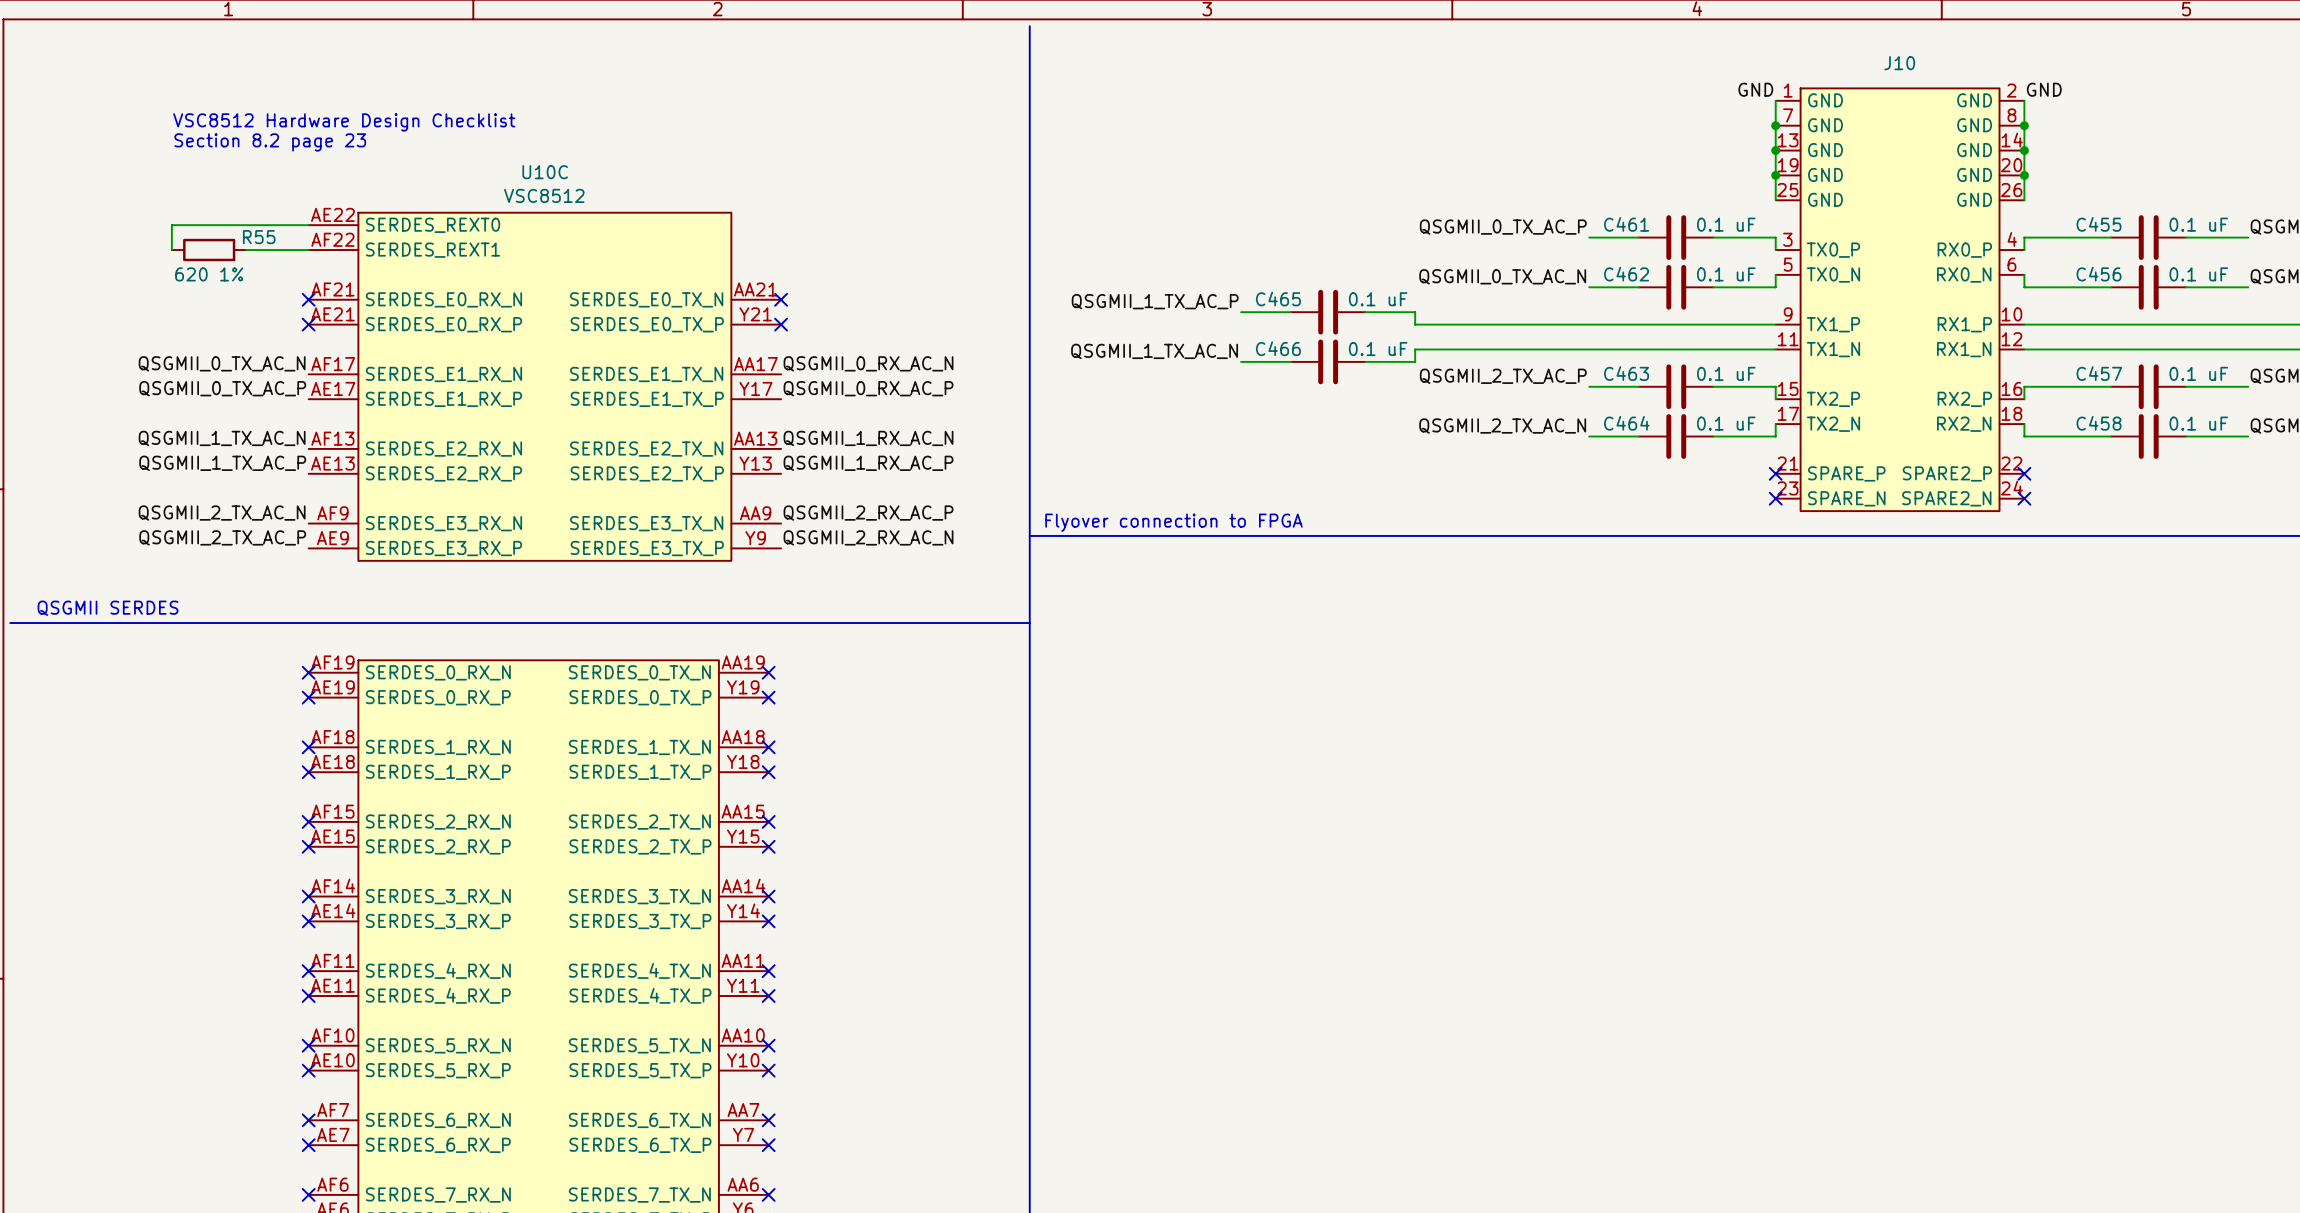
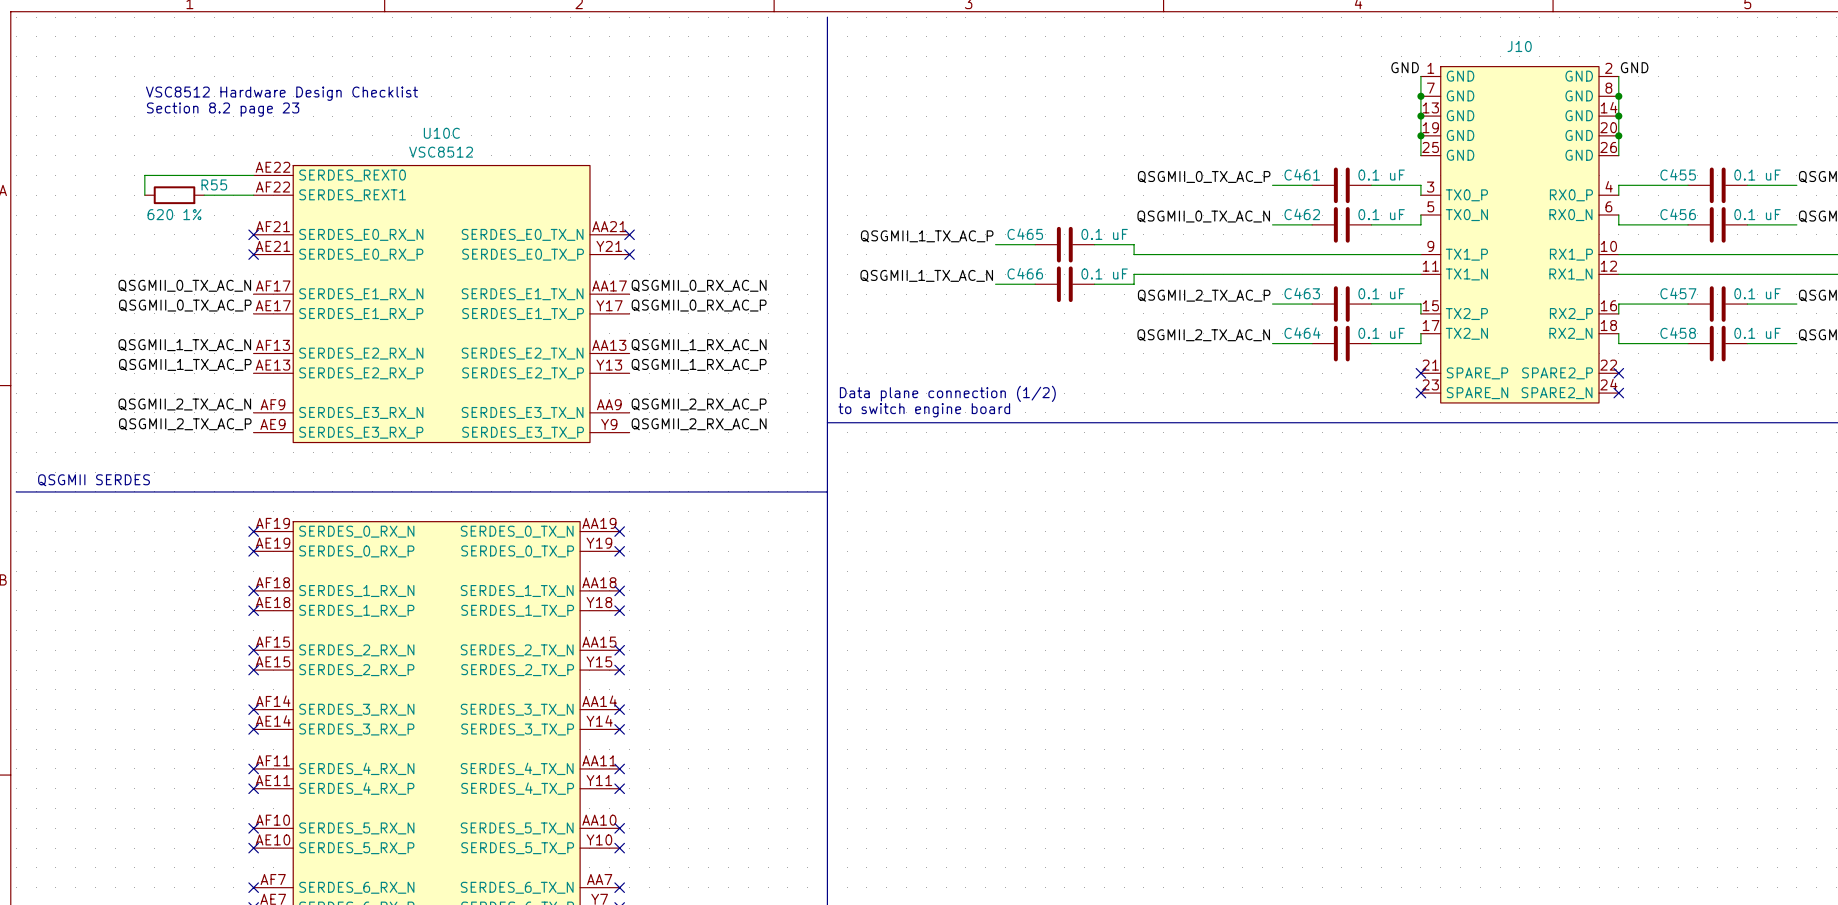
text: none -> Data plane connection (1/2) (947, 393)
text: Flyover connection to FPGA (1174, 522) -> to switch engine board (924, 410)

